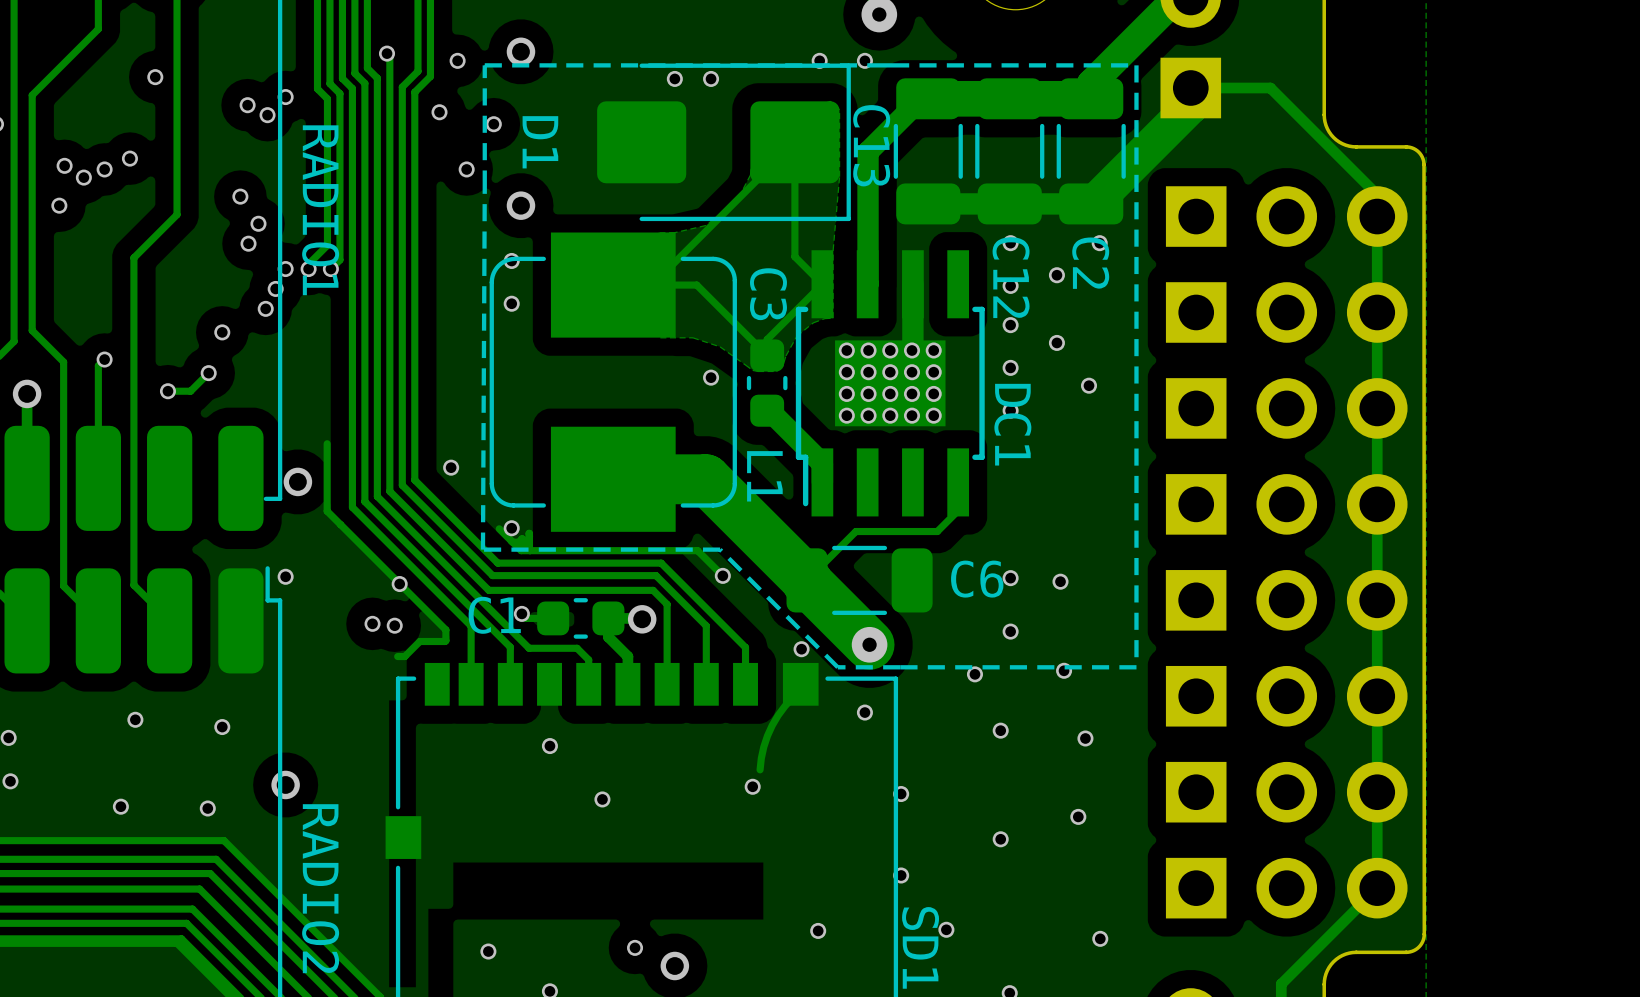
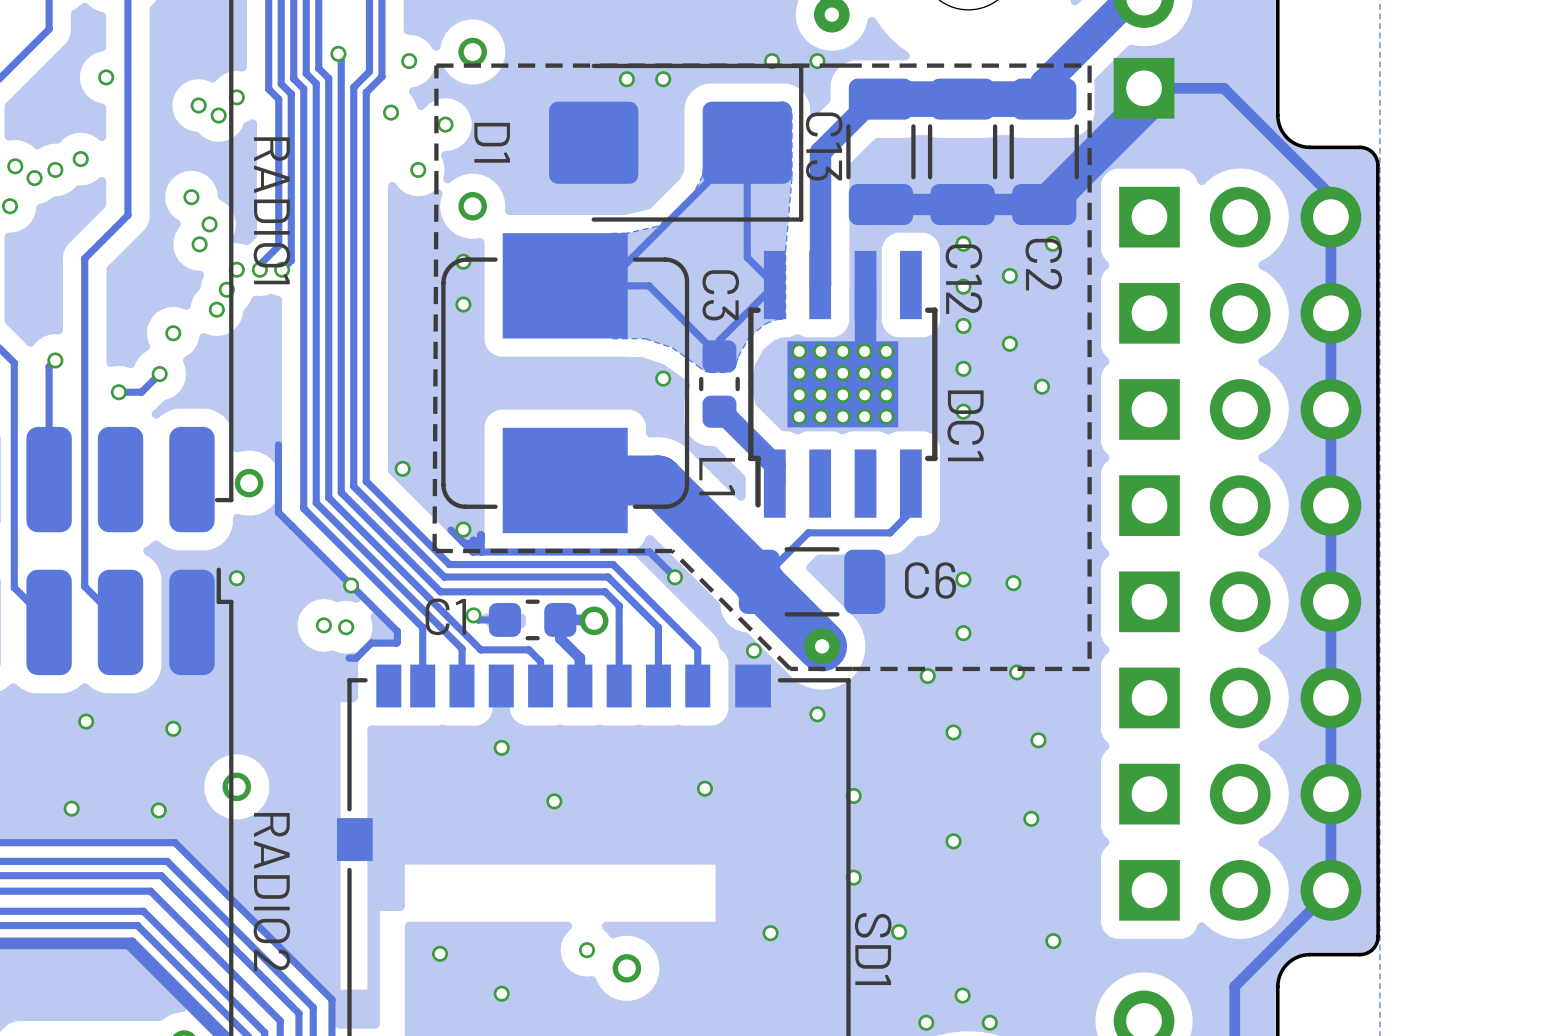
track: (801, 689) (785, 706) (772, 725) (763, 746) (760, 769) -> none

